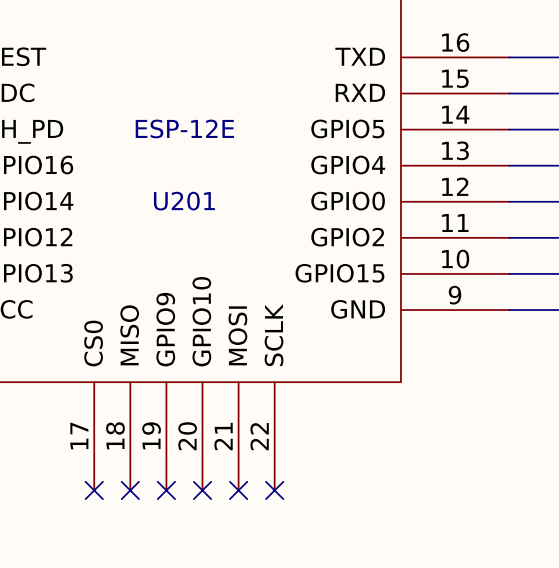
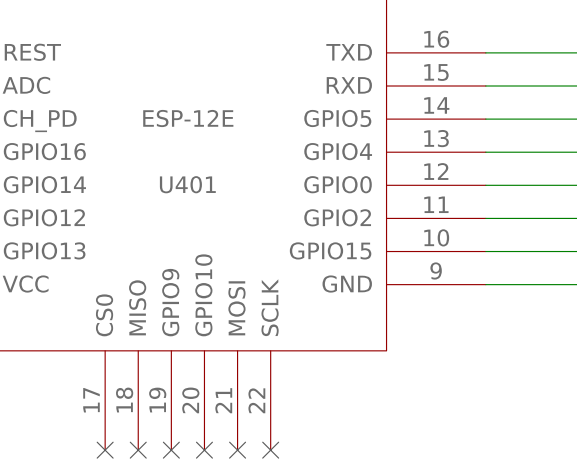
U201 name: U201 (184, 201) -> U401 (187, 184)

